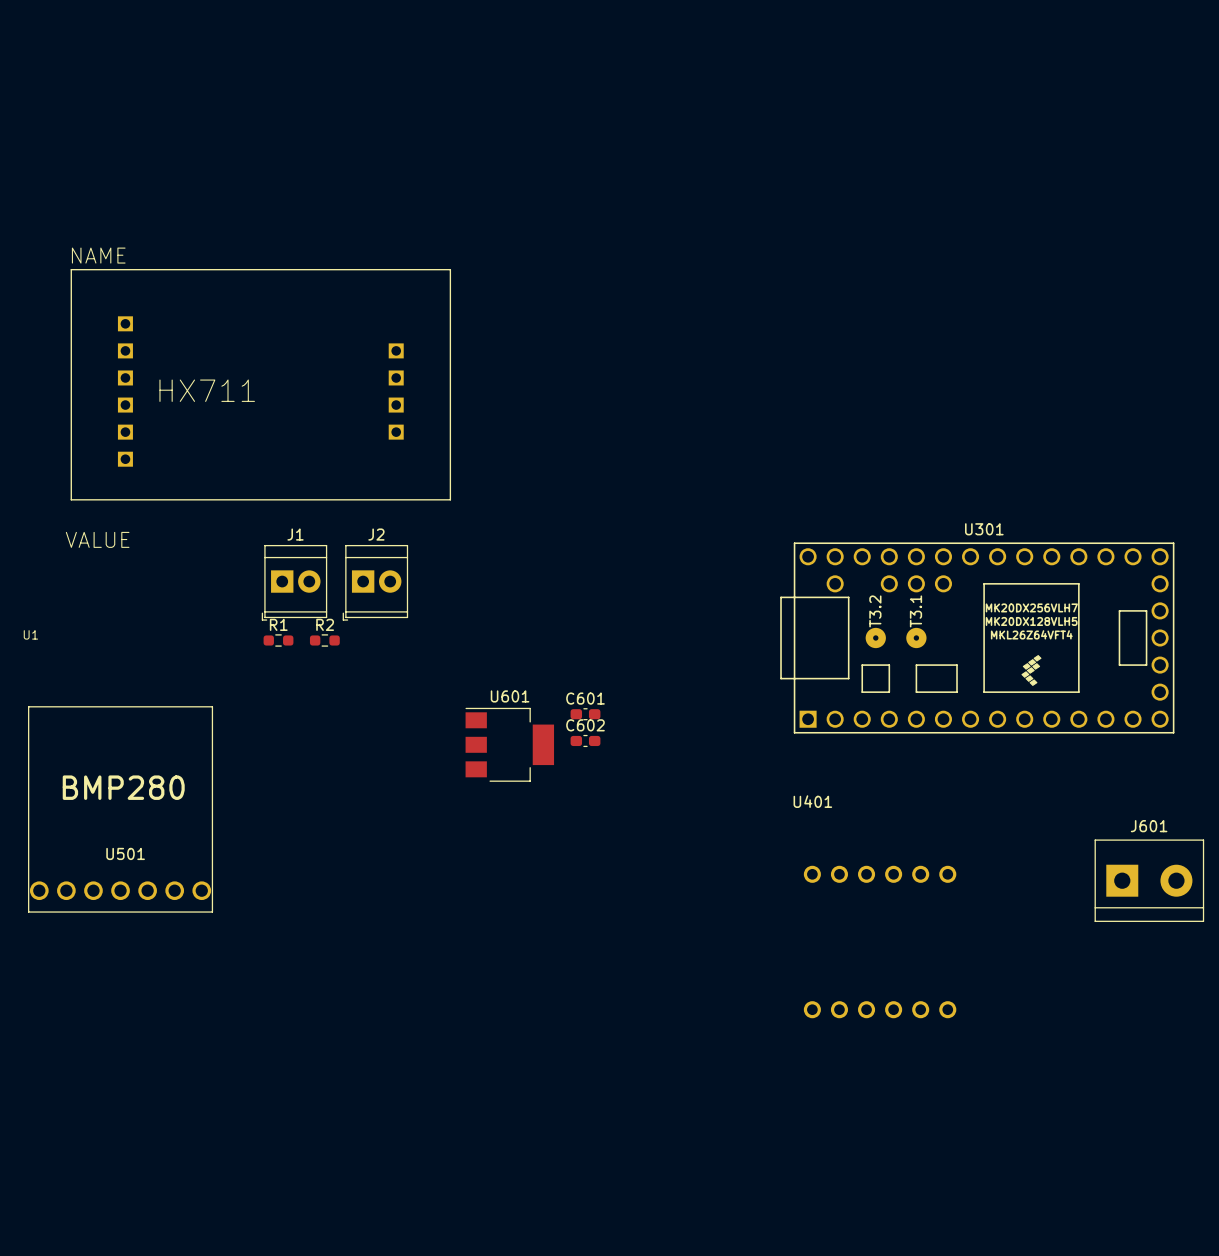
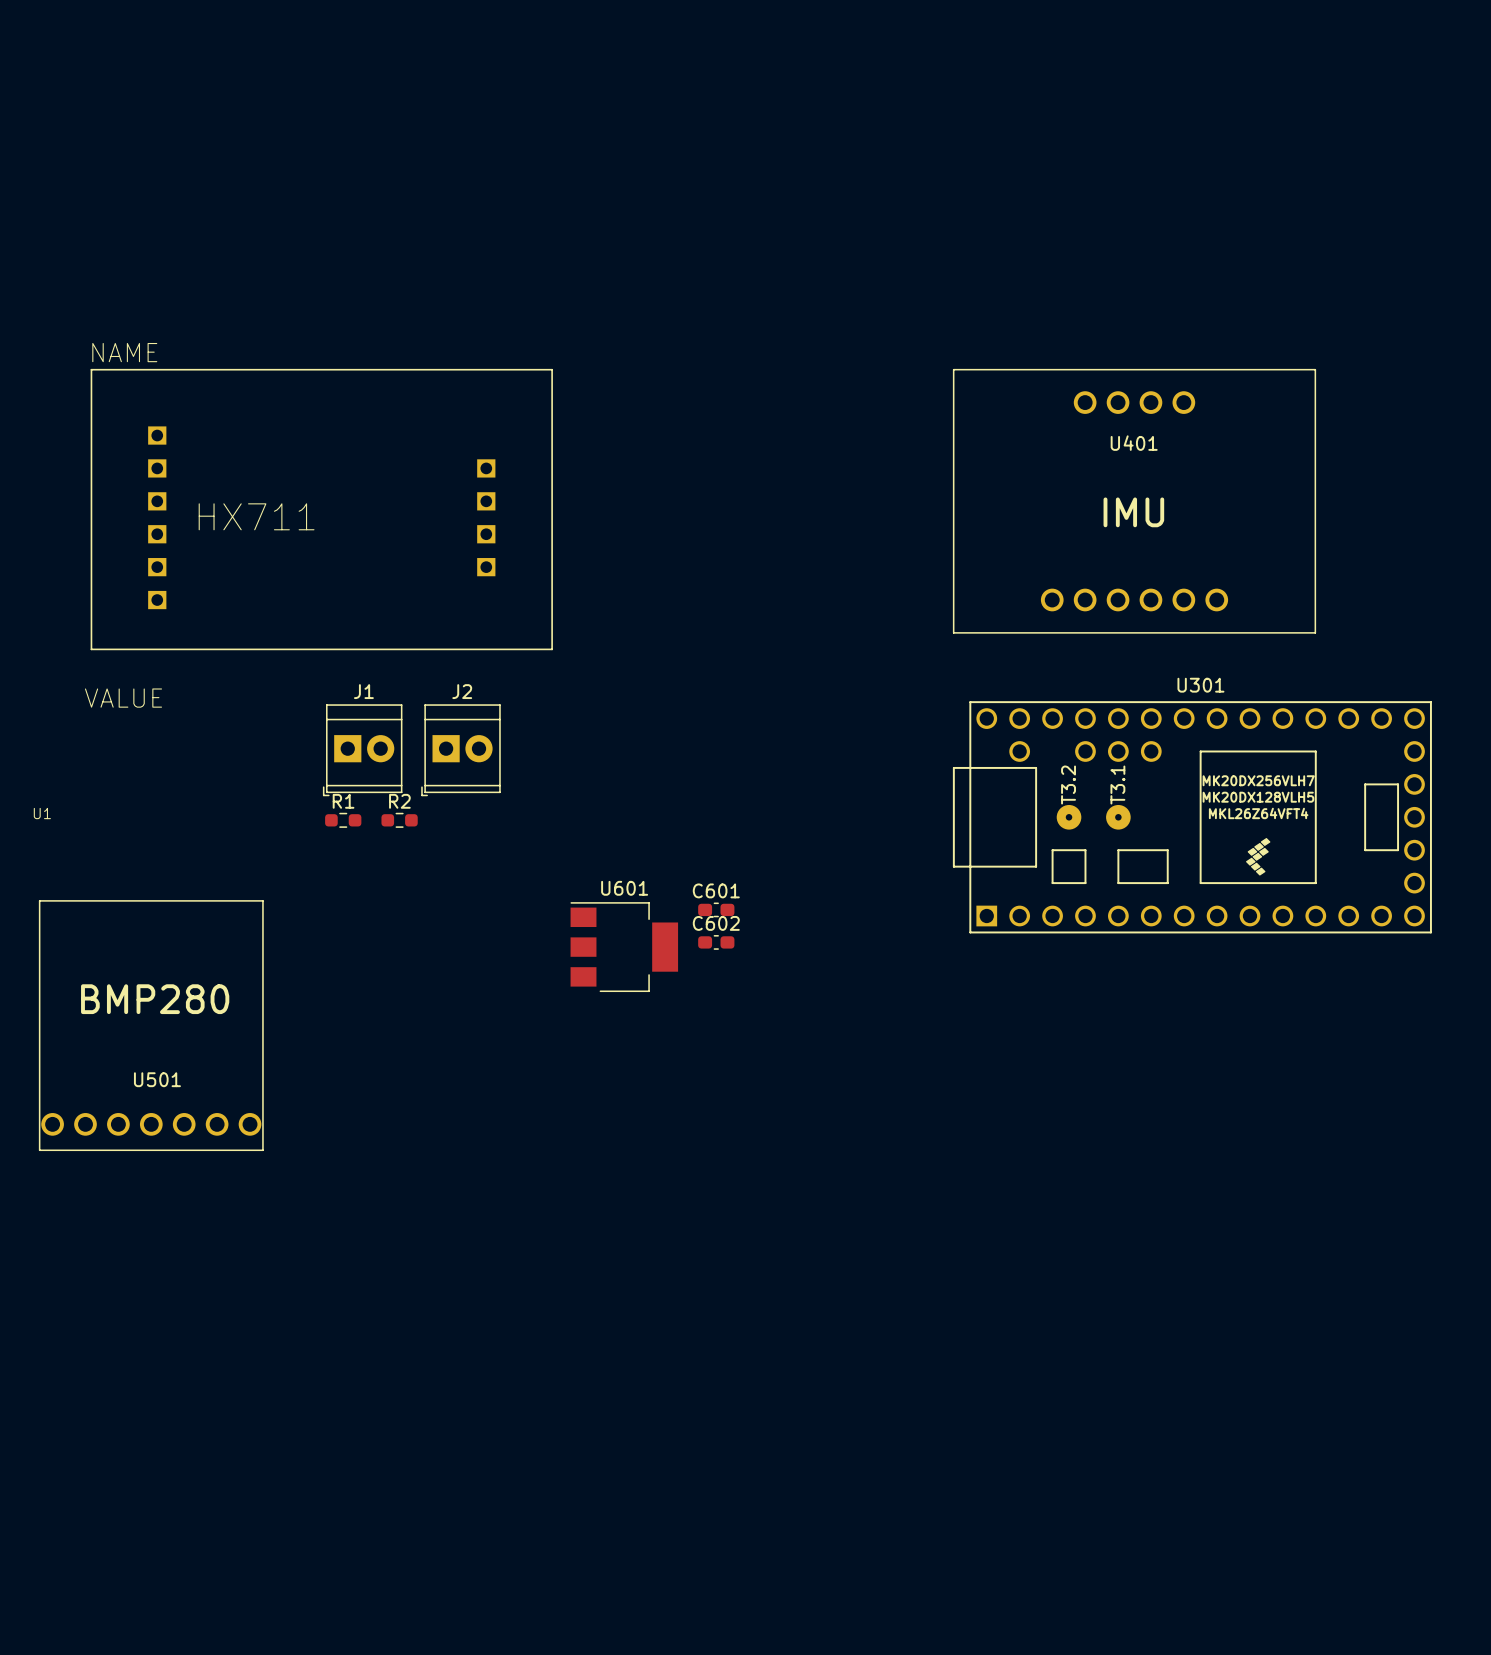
U401 name position: U401 (812, 801) -> U401 (1134, 443)
U401 footprint: [803, 865, 957, 1019] -> [952, 368, 1317, 634]
J601: (1149, 880) -> none

